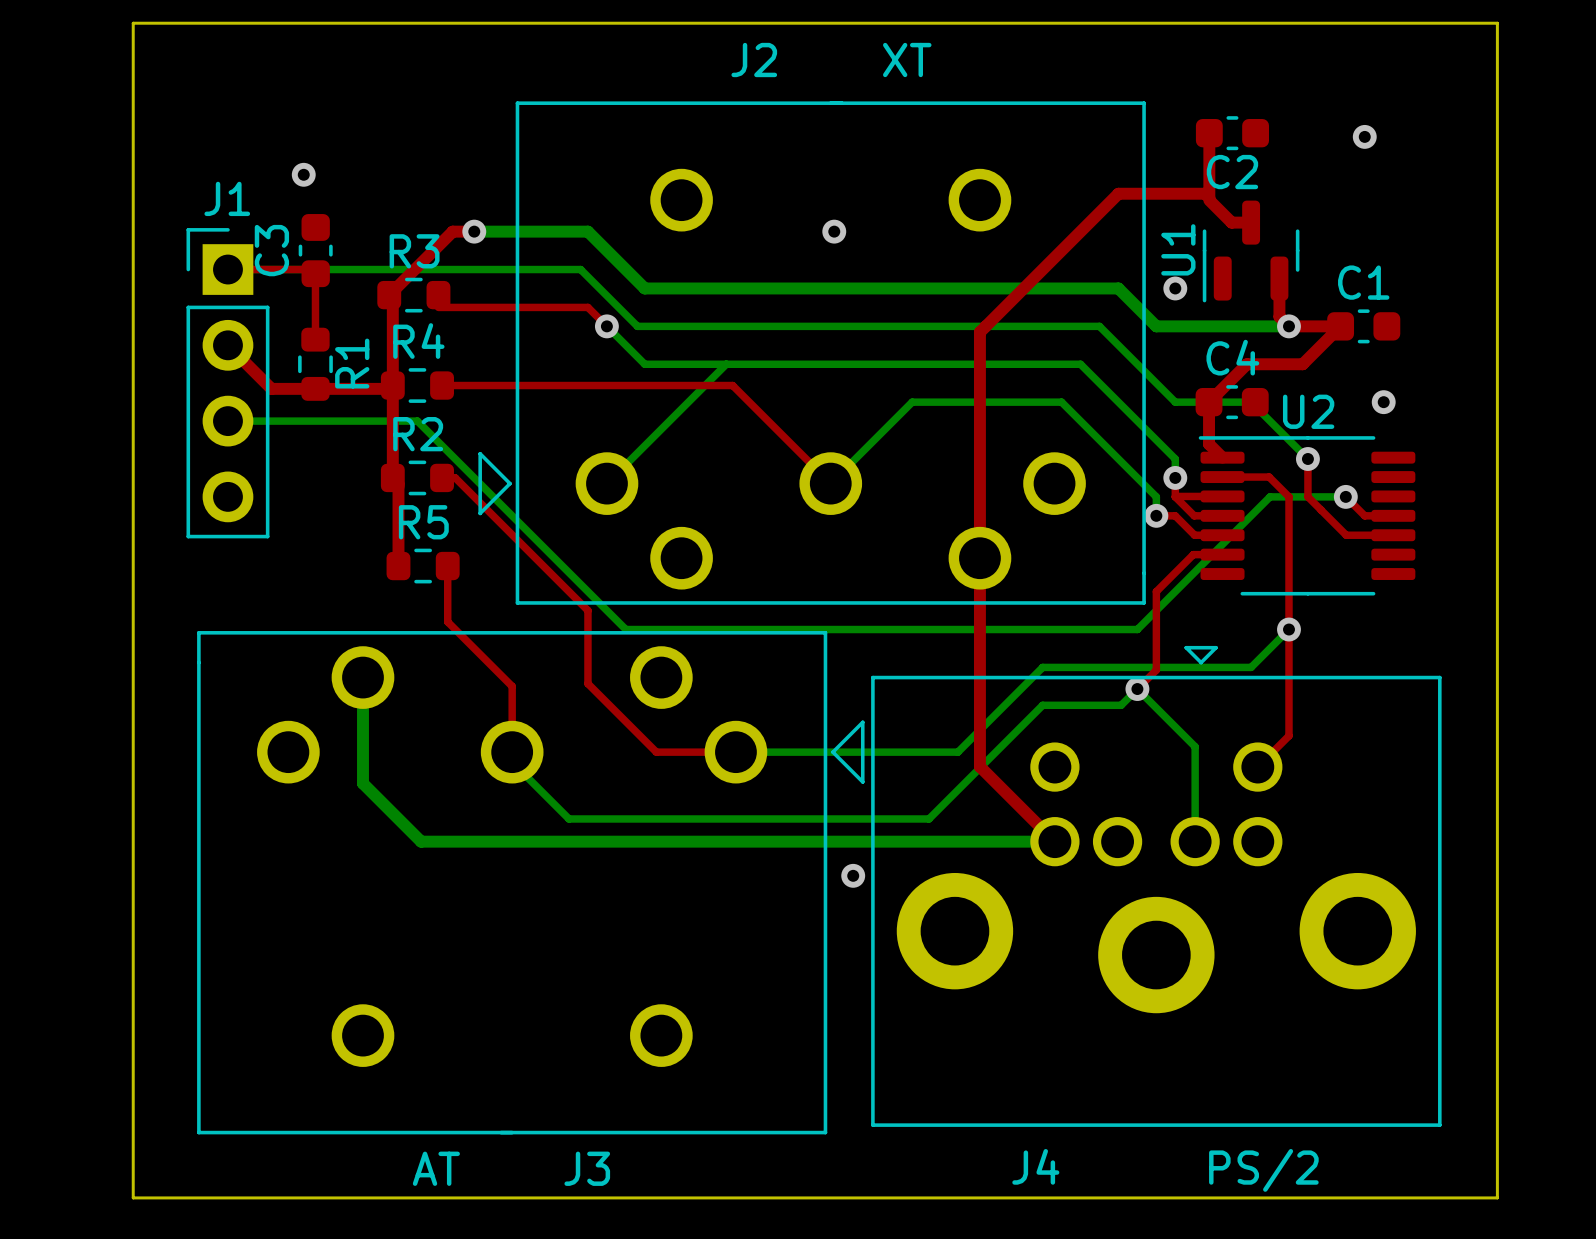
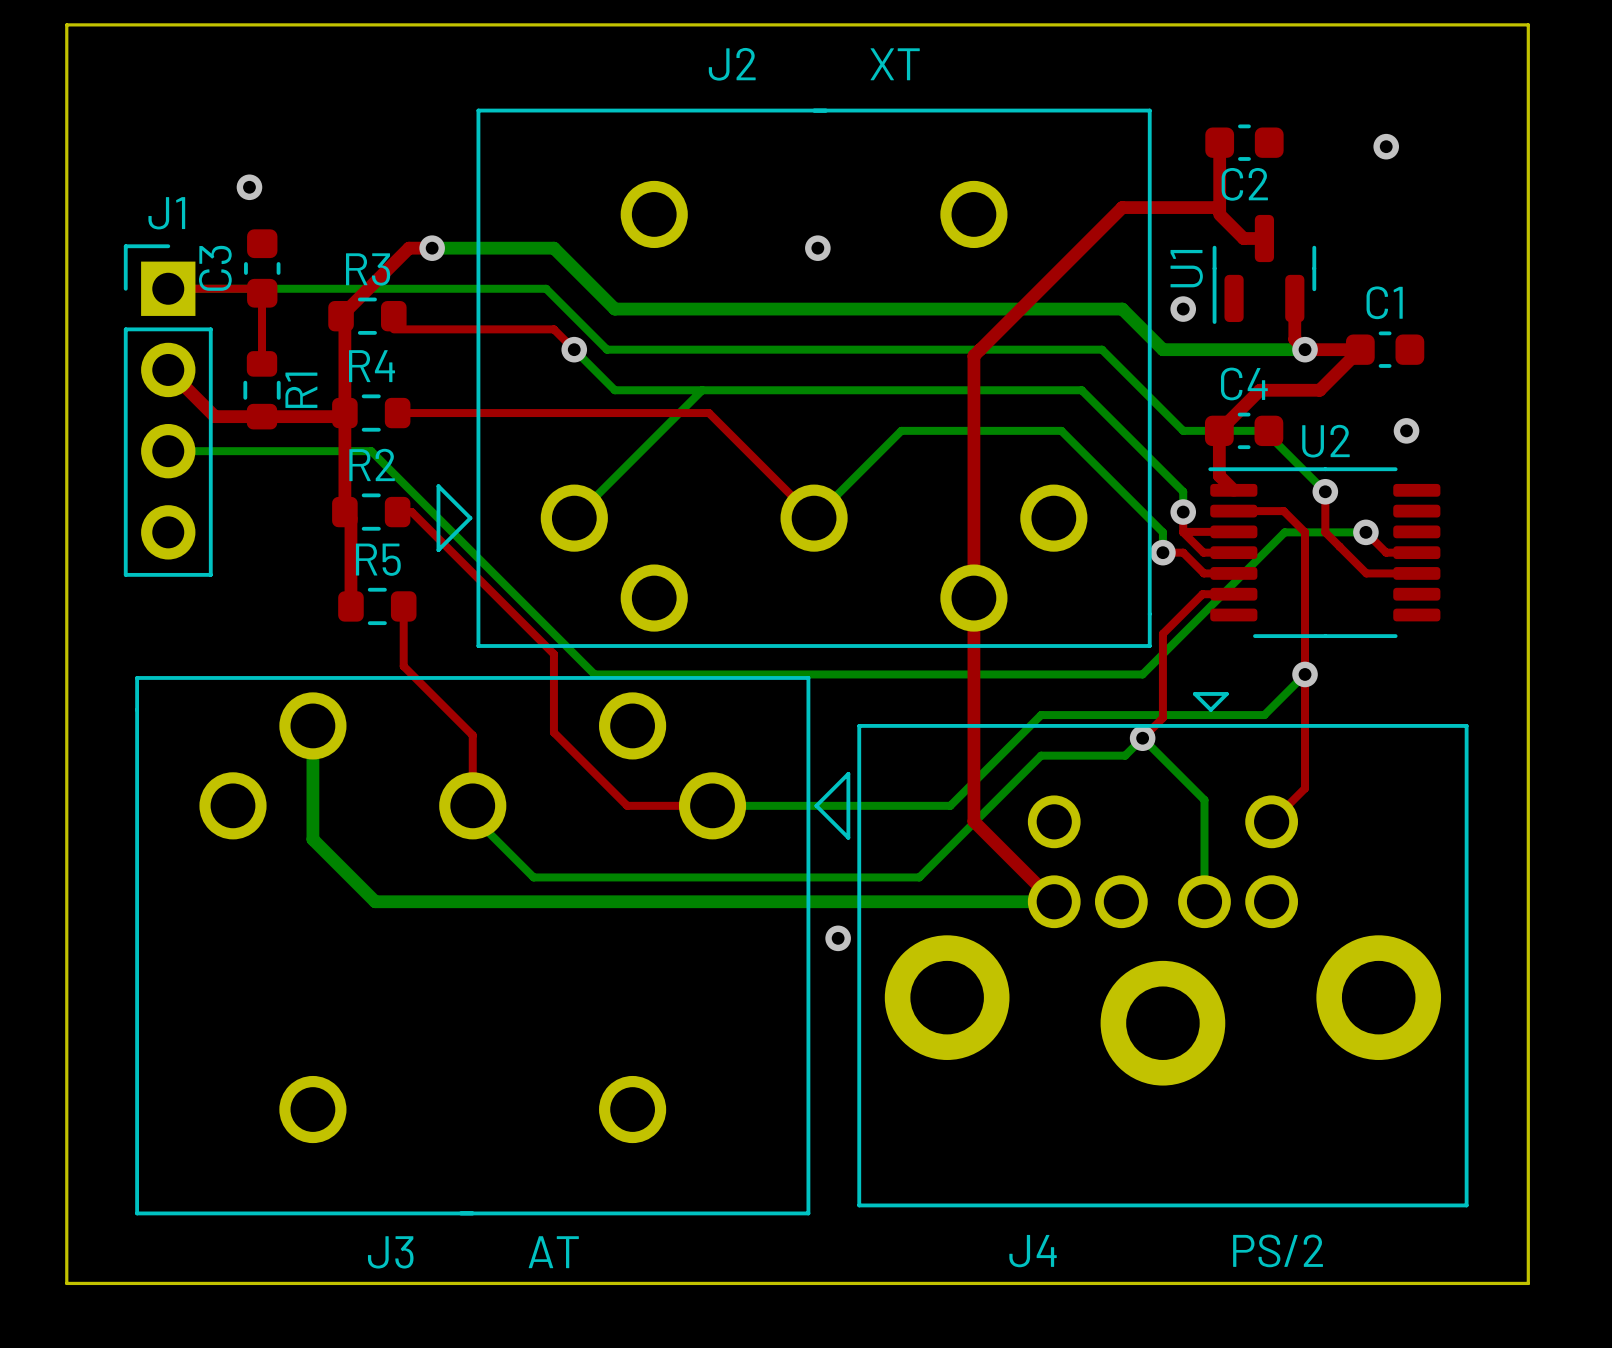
J3 value position: AT (436, 1168) -> AT (553, 1252)
J3 name position: J3 (587, 1168) -> J3 (390, 1252)

